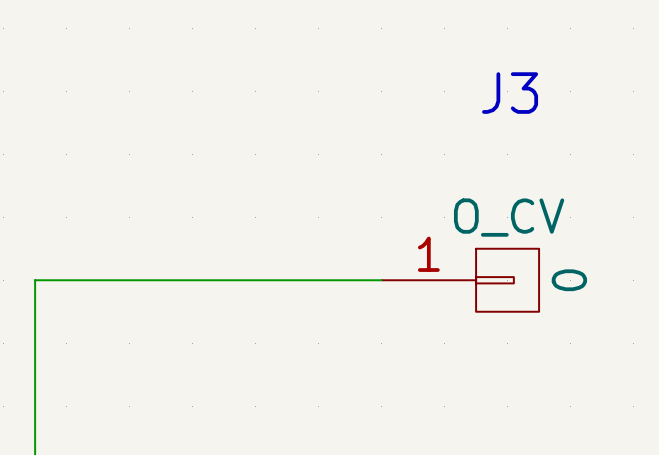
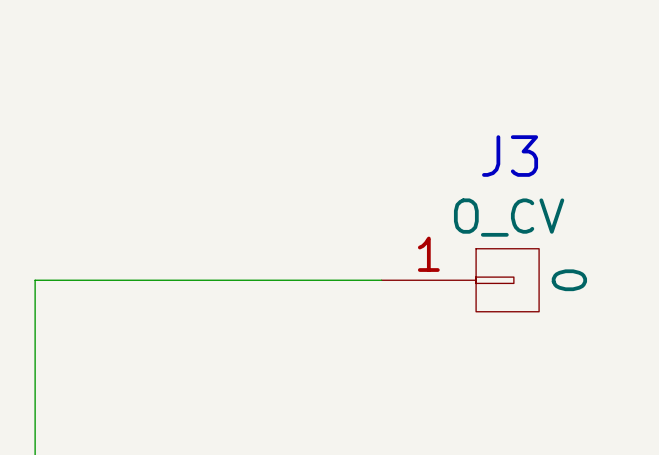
text position: J3 (510, 93) -> J3 (510, 156)

